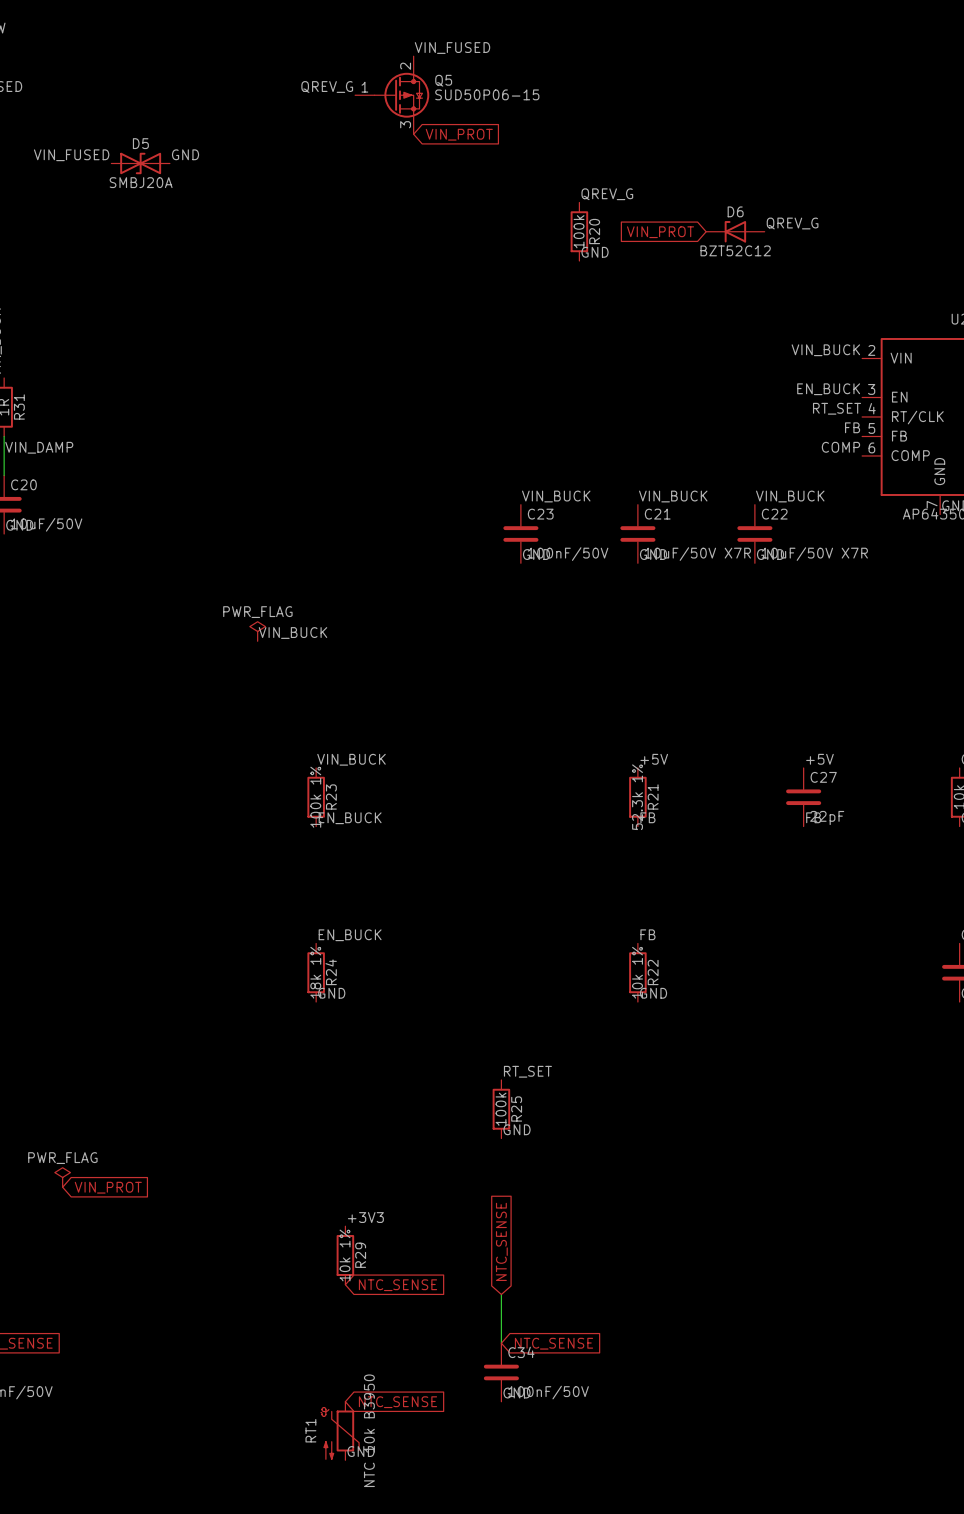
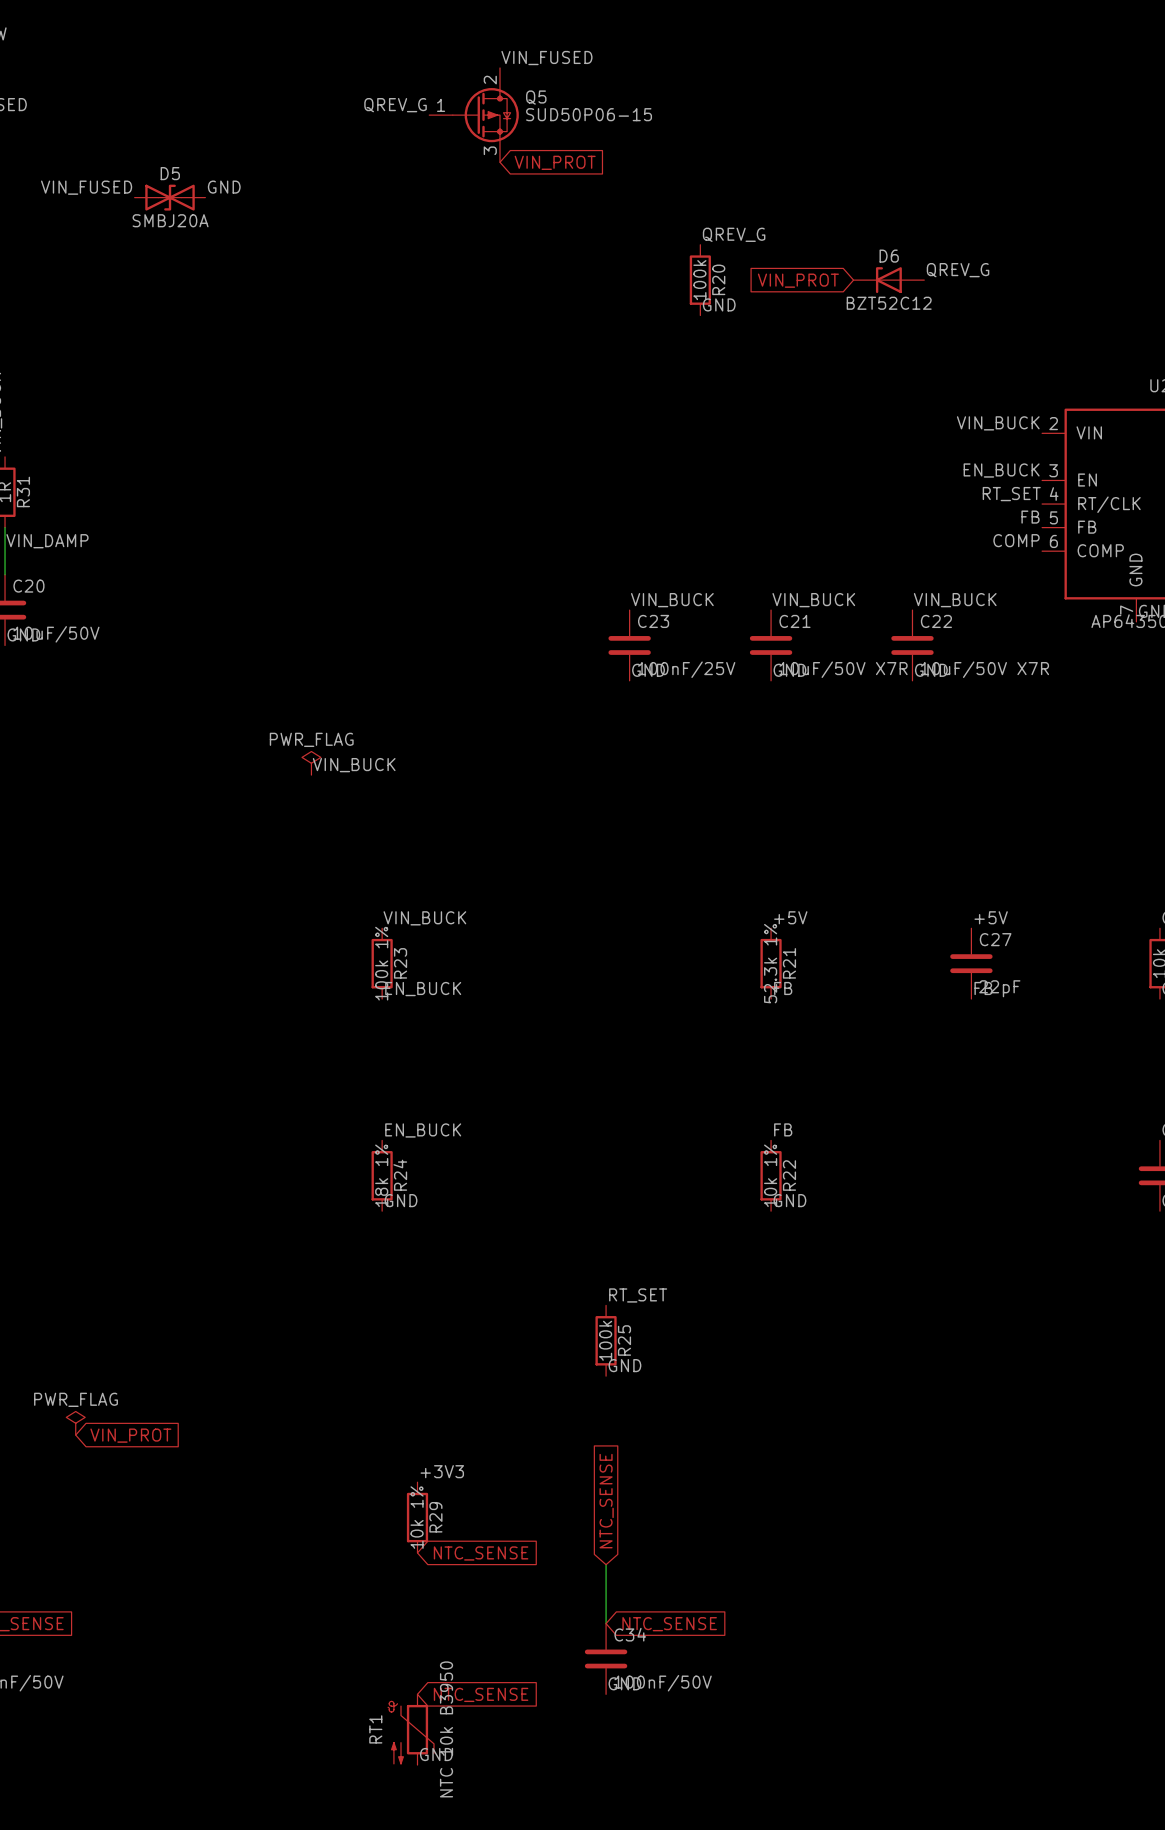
C23 value: 100nF/50V (568, 554) -> 100nF/25V (686, 669)

